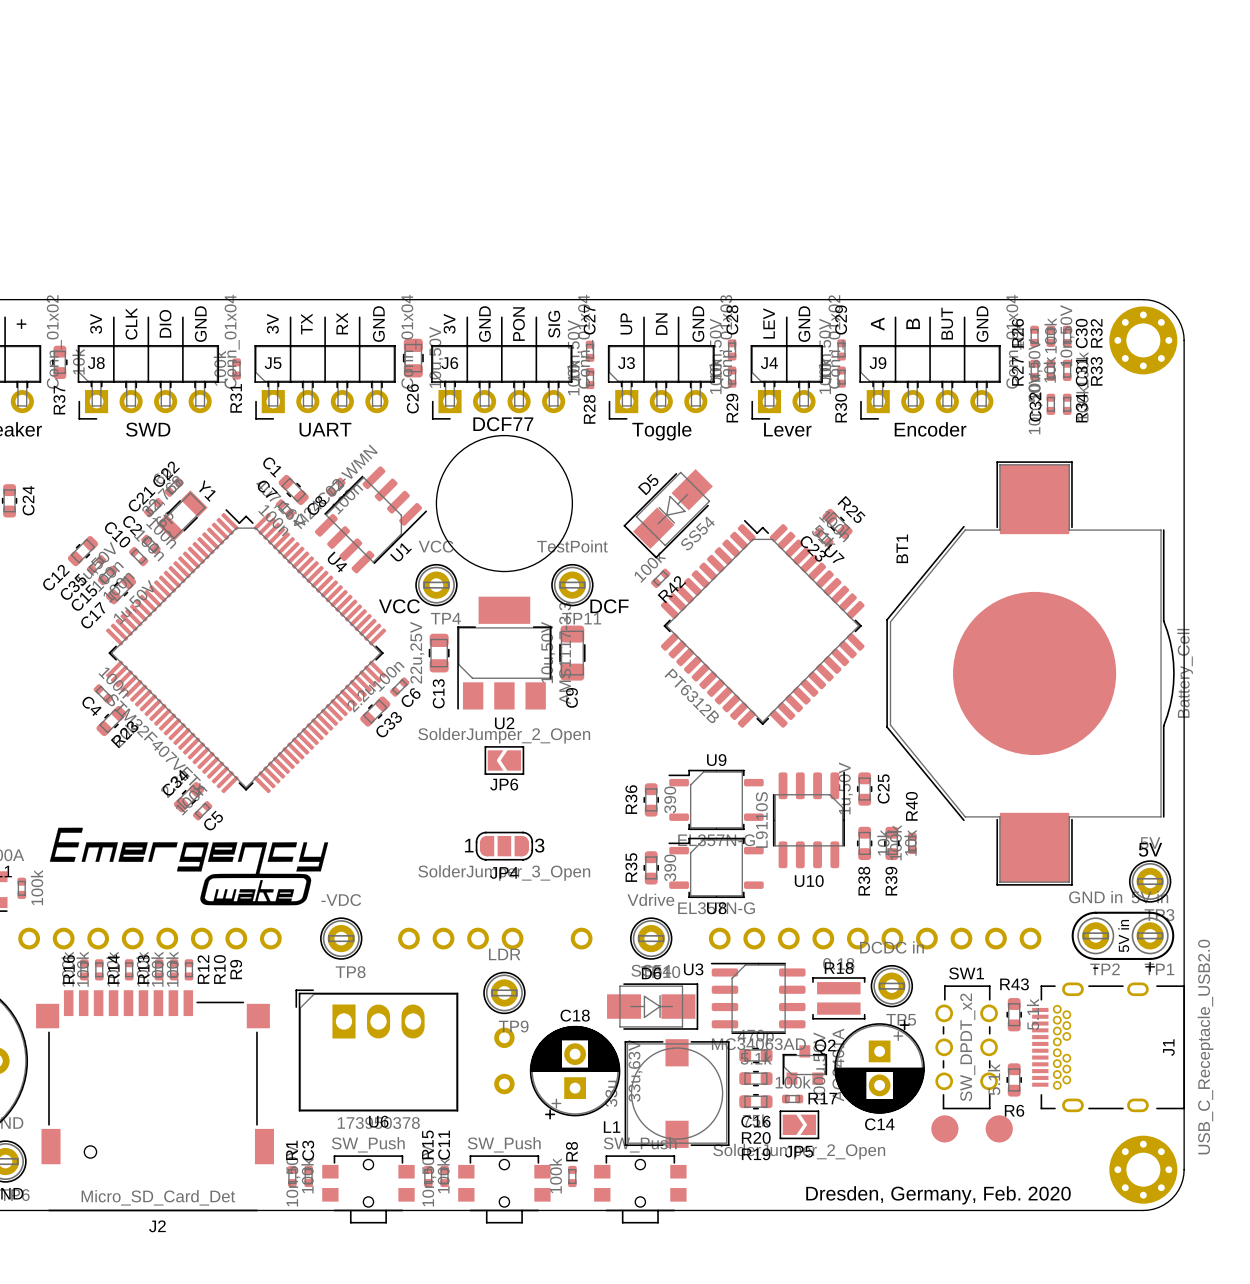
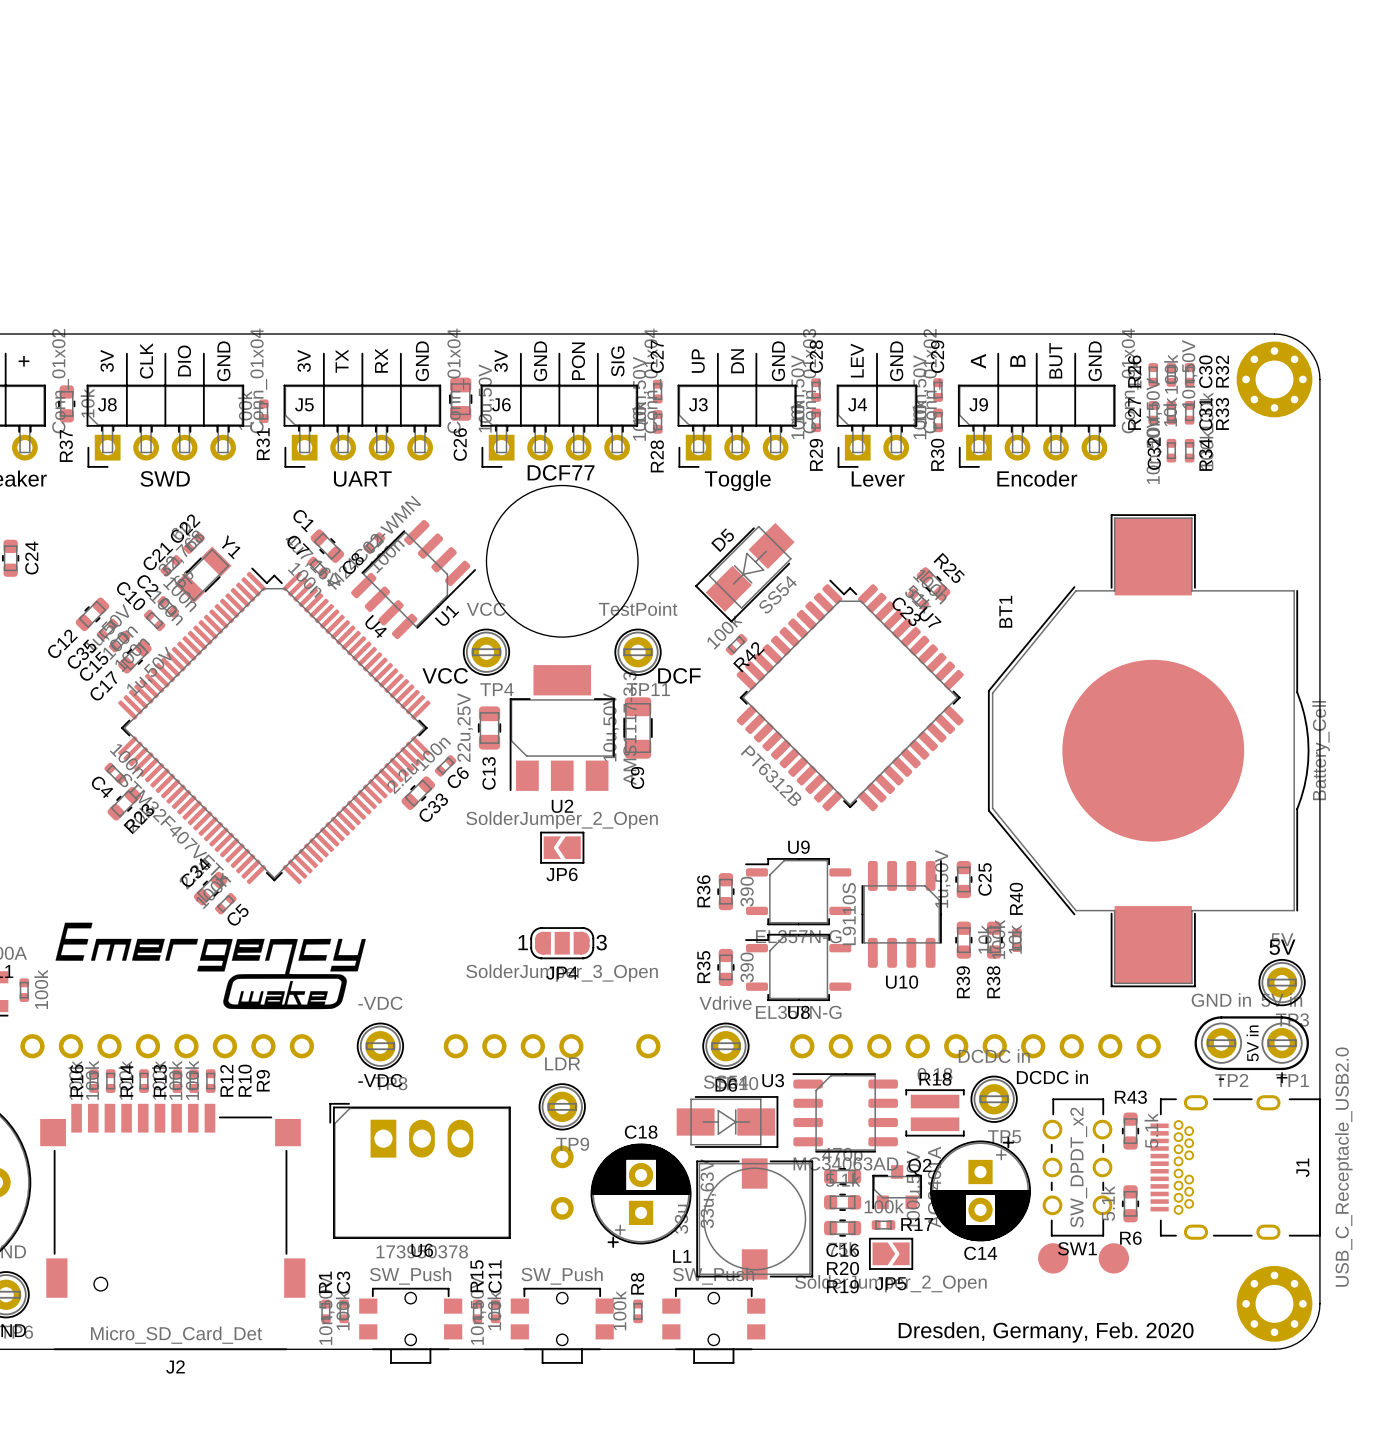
R38 name: R38 (864, 881) -> R39 (963, 982)
R39 name: R39 (891, 881) -> R38 (993, 982)
text: none -> DCDC in (1052, 1077)
text: none -> -VDC (380, 1080)
SW1 name position: SW1 (966, 973) -> SW1 (1077, 1248)

